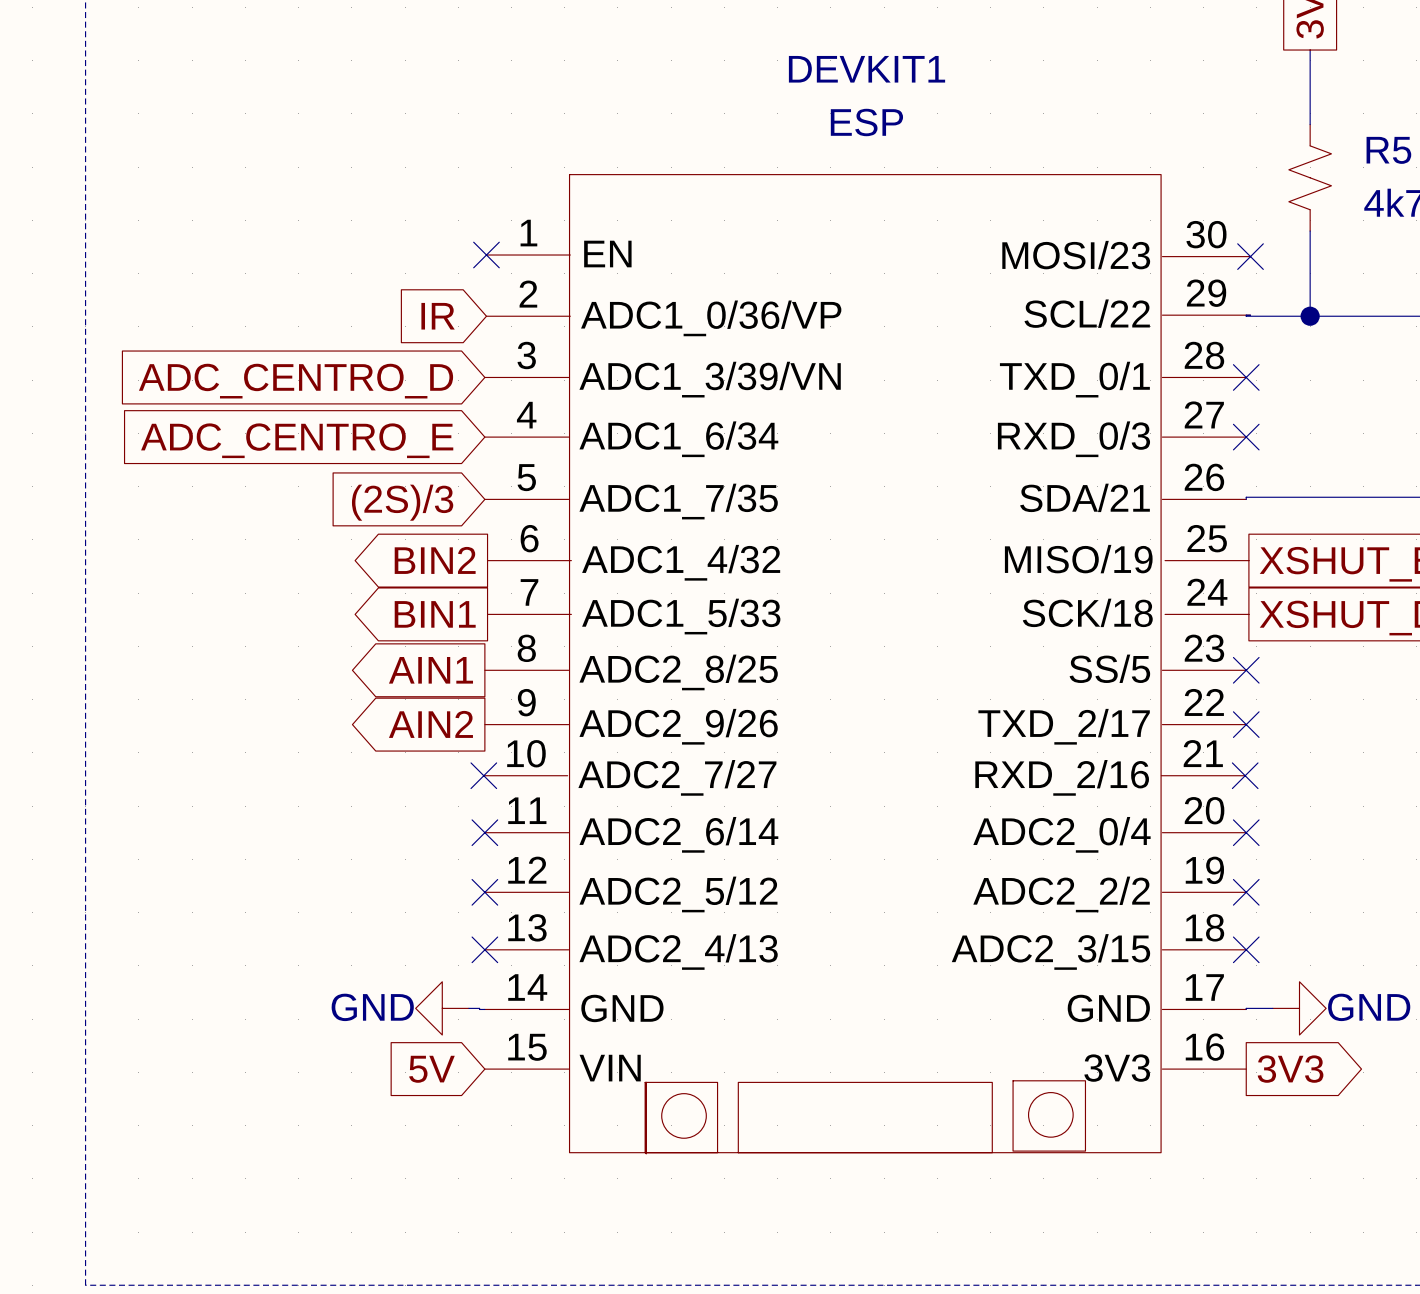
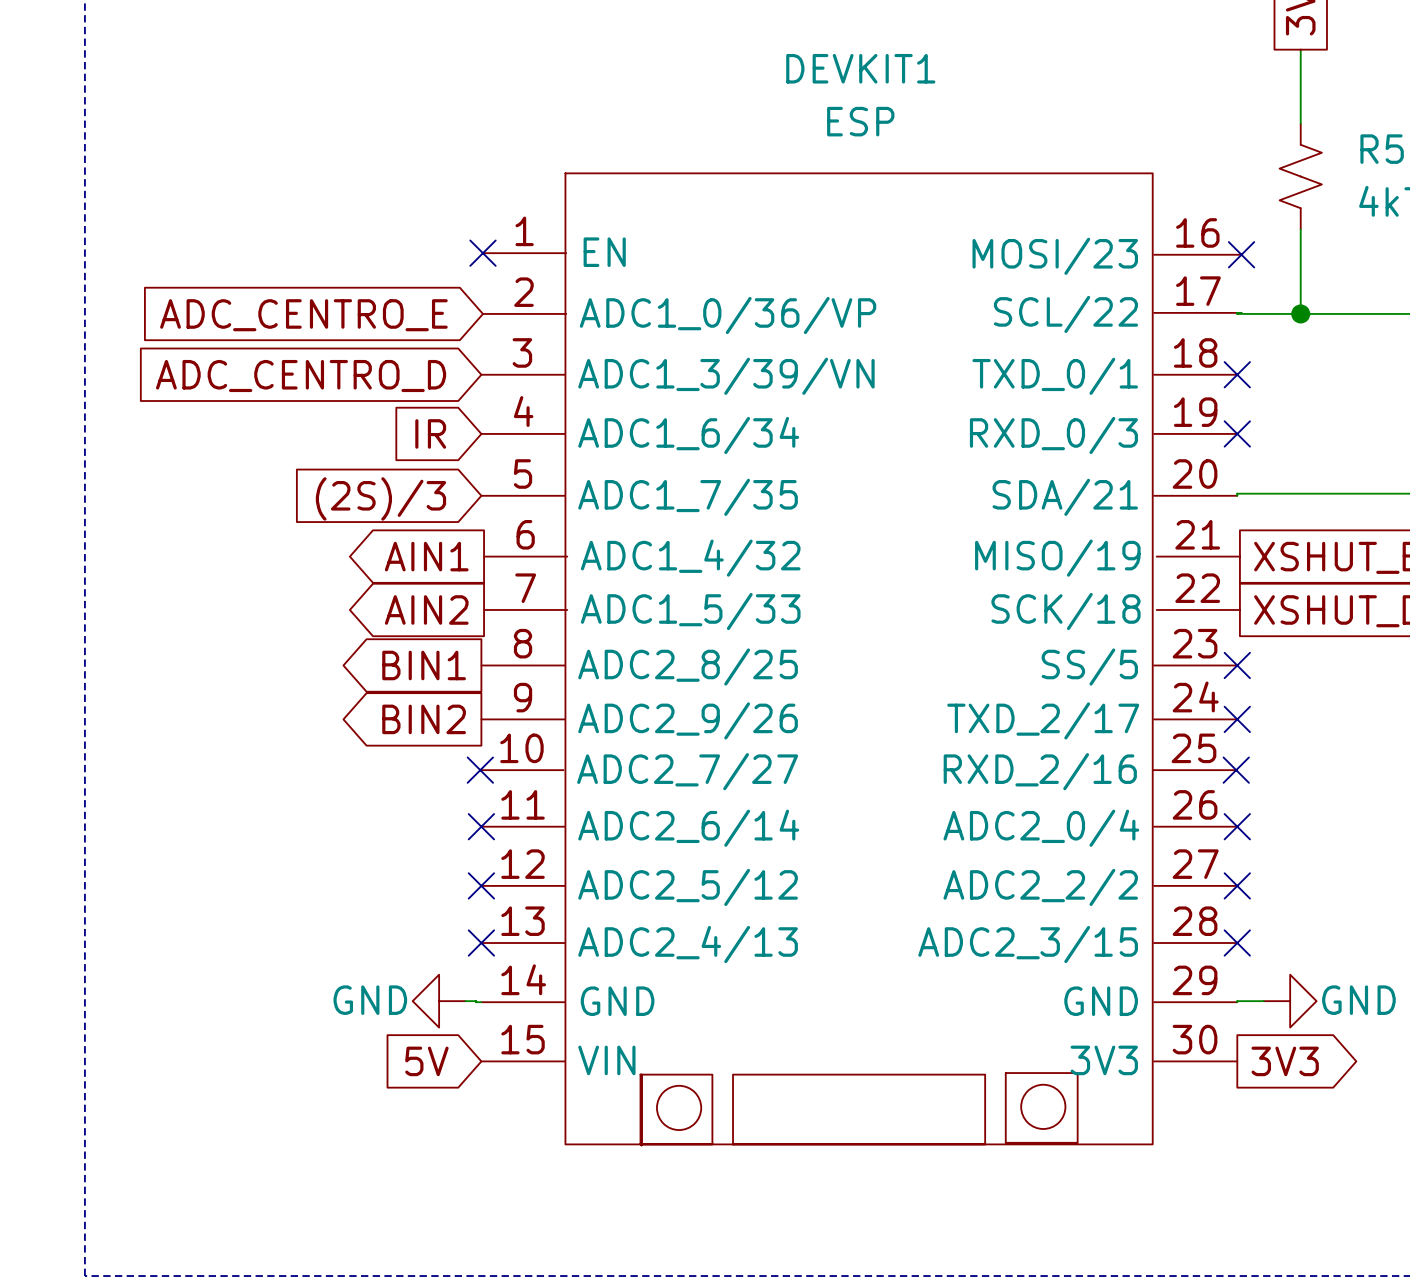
DEVKIT1 symbol: [483, 174, 1251, 1154] -> [480, 173, 1242, 1146]
global label: IR (438, 316) -> ADC_CENTRO_E (303, 315)
global label: ADC_CENTRO_E (297, 440) -> IR (430, 433)
global label: BIN2 (435, 560) -> AIN1 (426, 556)
global label: BIN1 (435, 614) -> AIN2 (426, 609)
global label: AIN1 (430, 670) -> BIN1 (424, 665)
global label: AIN2 (430, 724) -> BIN2 (424, 719)

